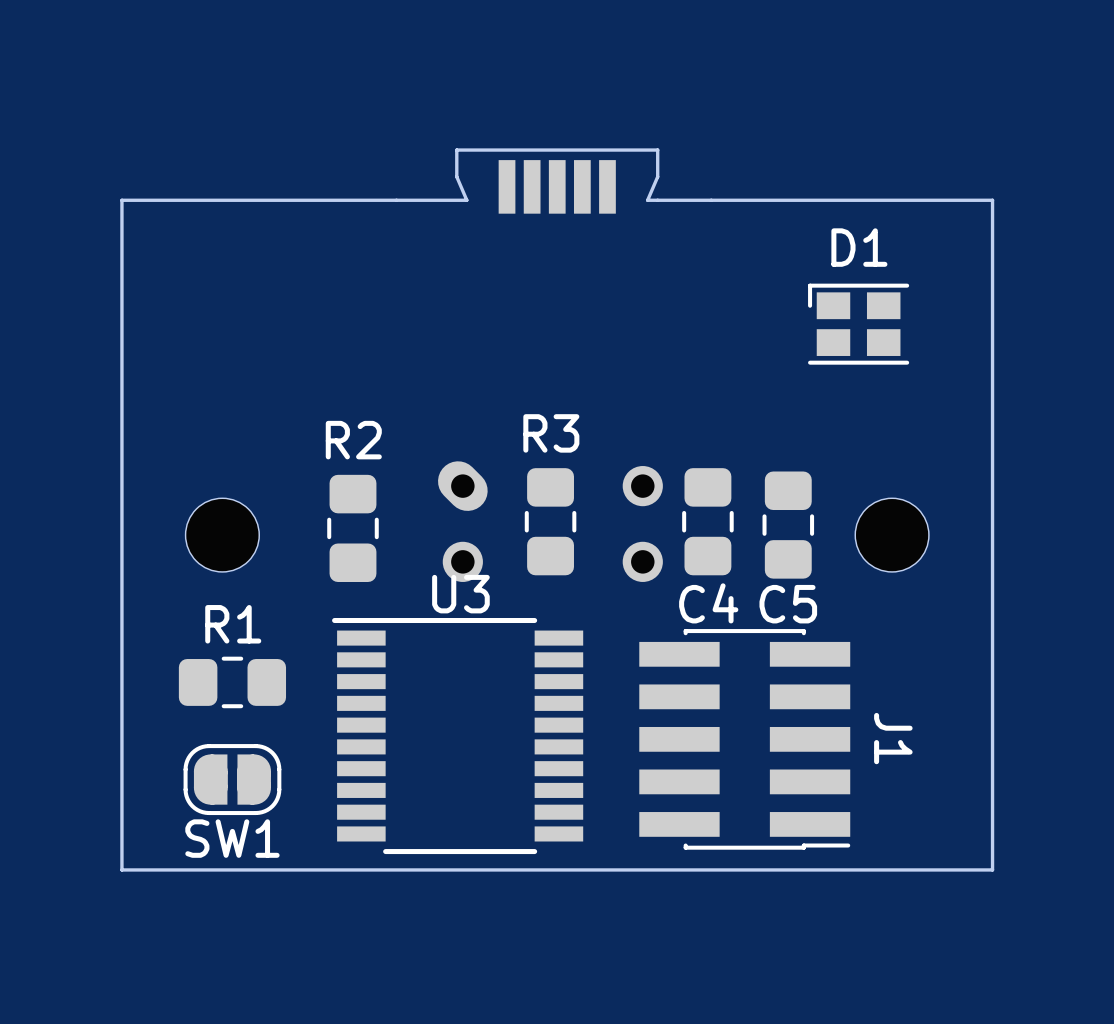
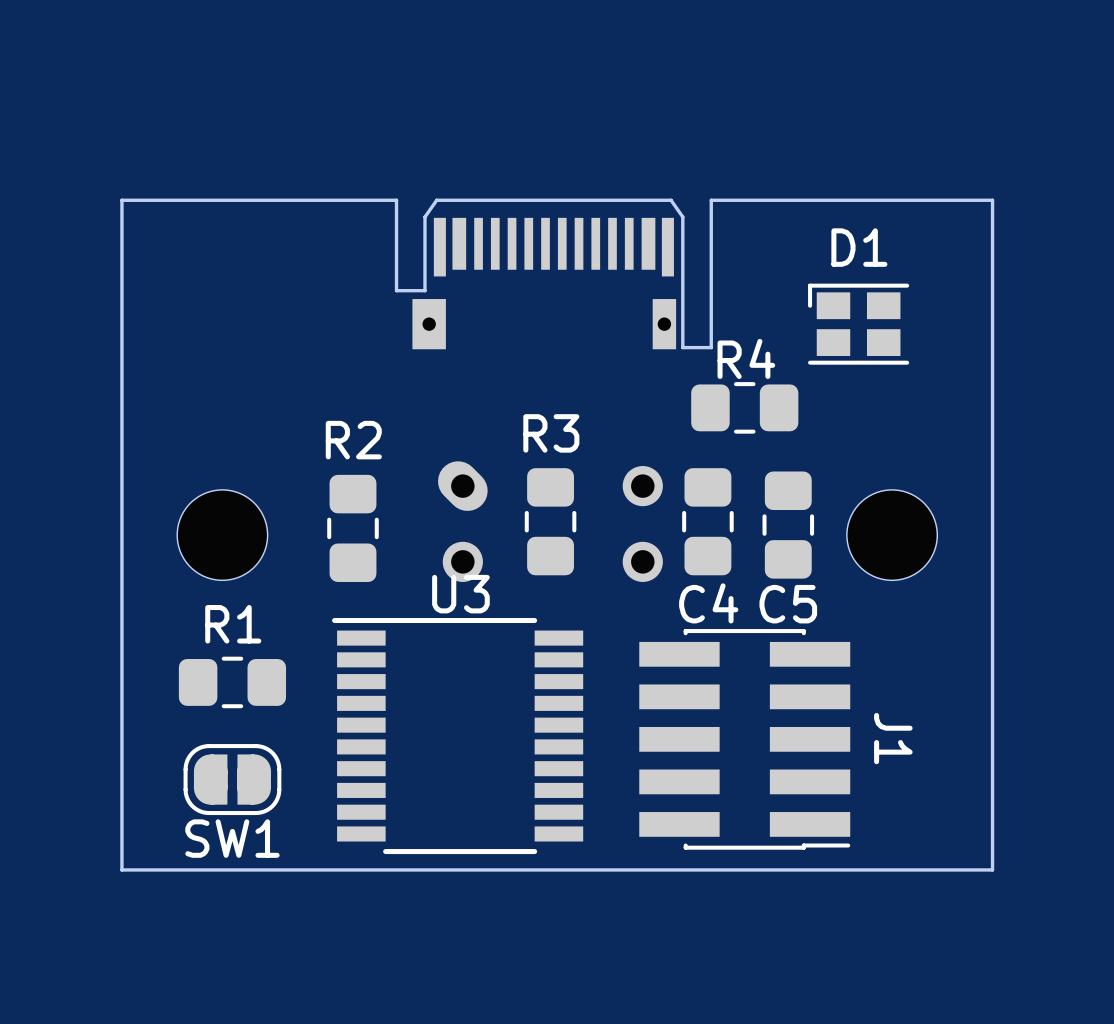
part: (557, 186) -> none
board edge: (436, 200) (396, 200) -> (436, 200) (424, 217) (424, 290) (396, 290) (396, 200)
board edge: (647, 200) (657, 176) (657, 150) (456, 150) (456, 176) (466, 200) -> (647, 200) (466, 200)
board edge: (711, 200) (671, 200) -> (711, 200) (711, 347) (682, 347) (682, 217) (671, 200)
part: none -> (544, 283)
R4: none -> (744, 407)
part footprint: [185, 498, 260, 572] -> [177, 489, 268, 581]
part footprint: [855, 498, 929, 572] -> [846, 489, 938, 581]

